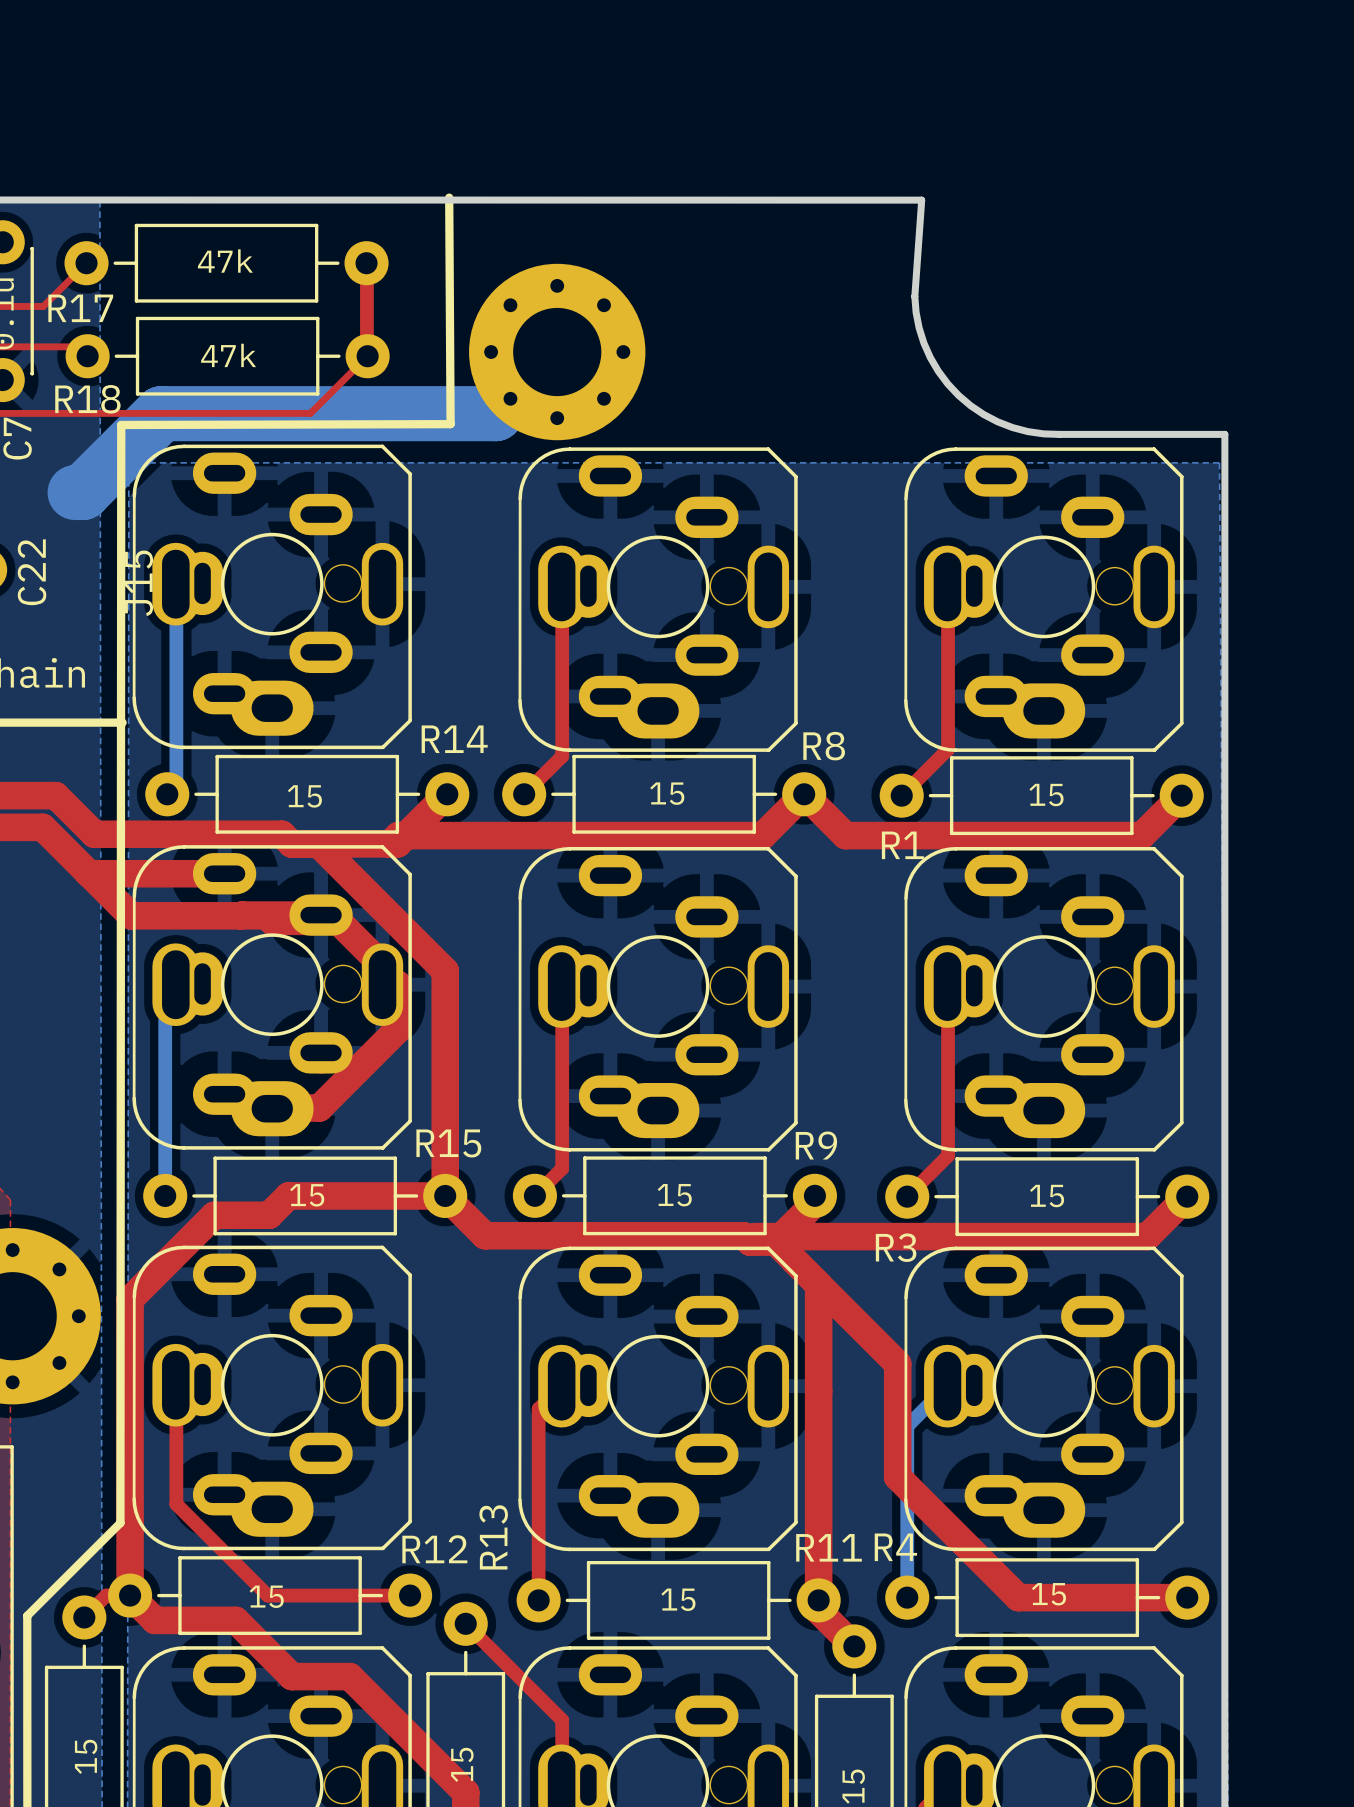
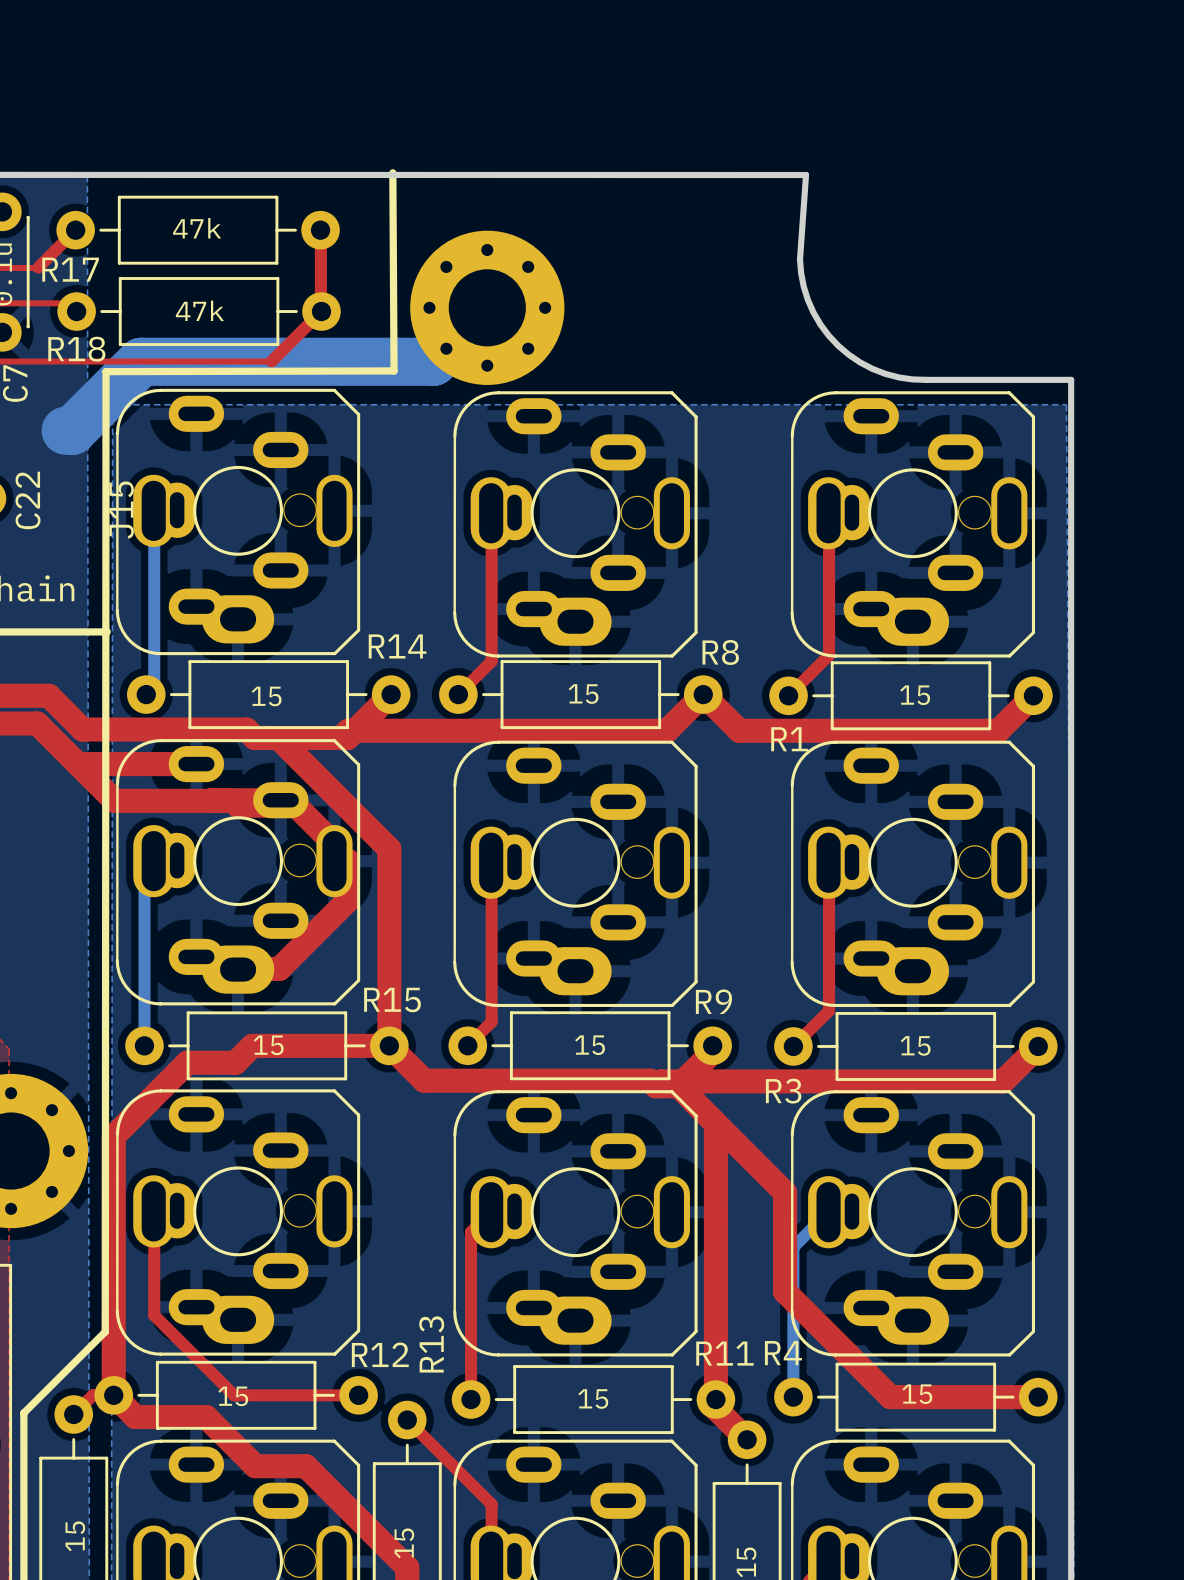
top track width: thin (86, 263) (43, 305) -> thick (75, 230) (38, 267)
top track width: thin (367, 356) (310, 413) -> thick (321, 311) (271, 361)

